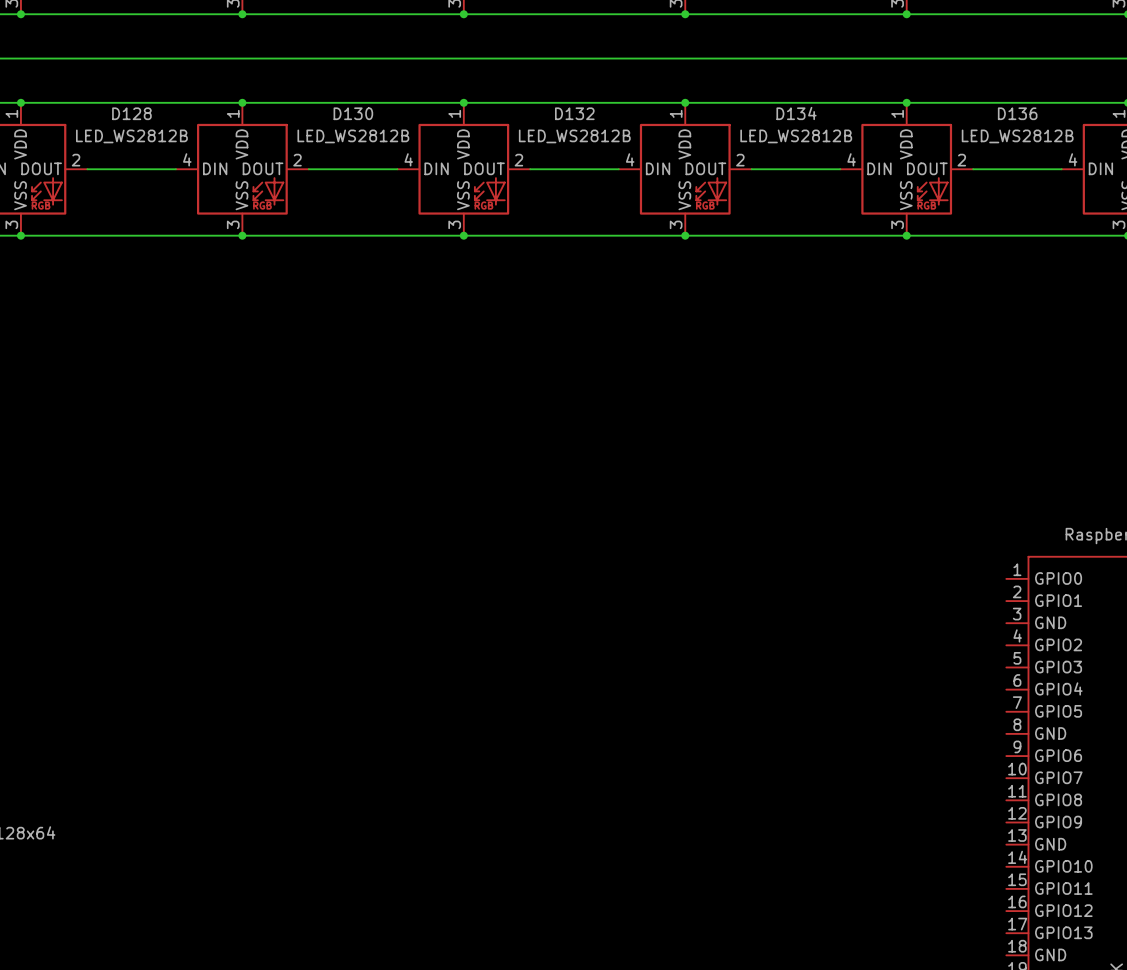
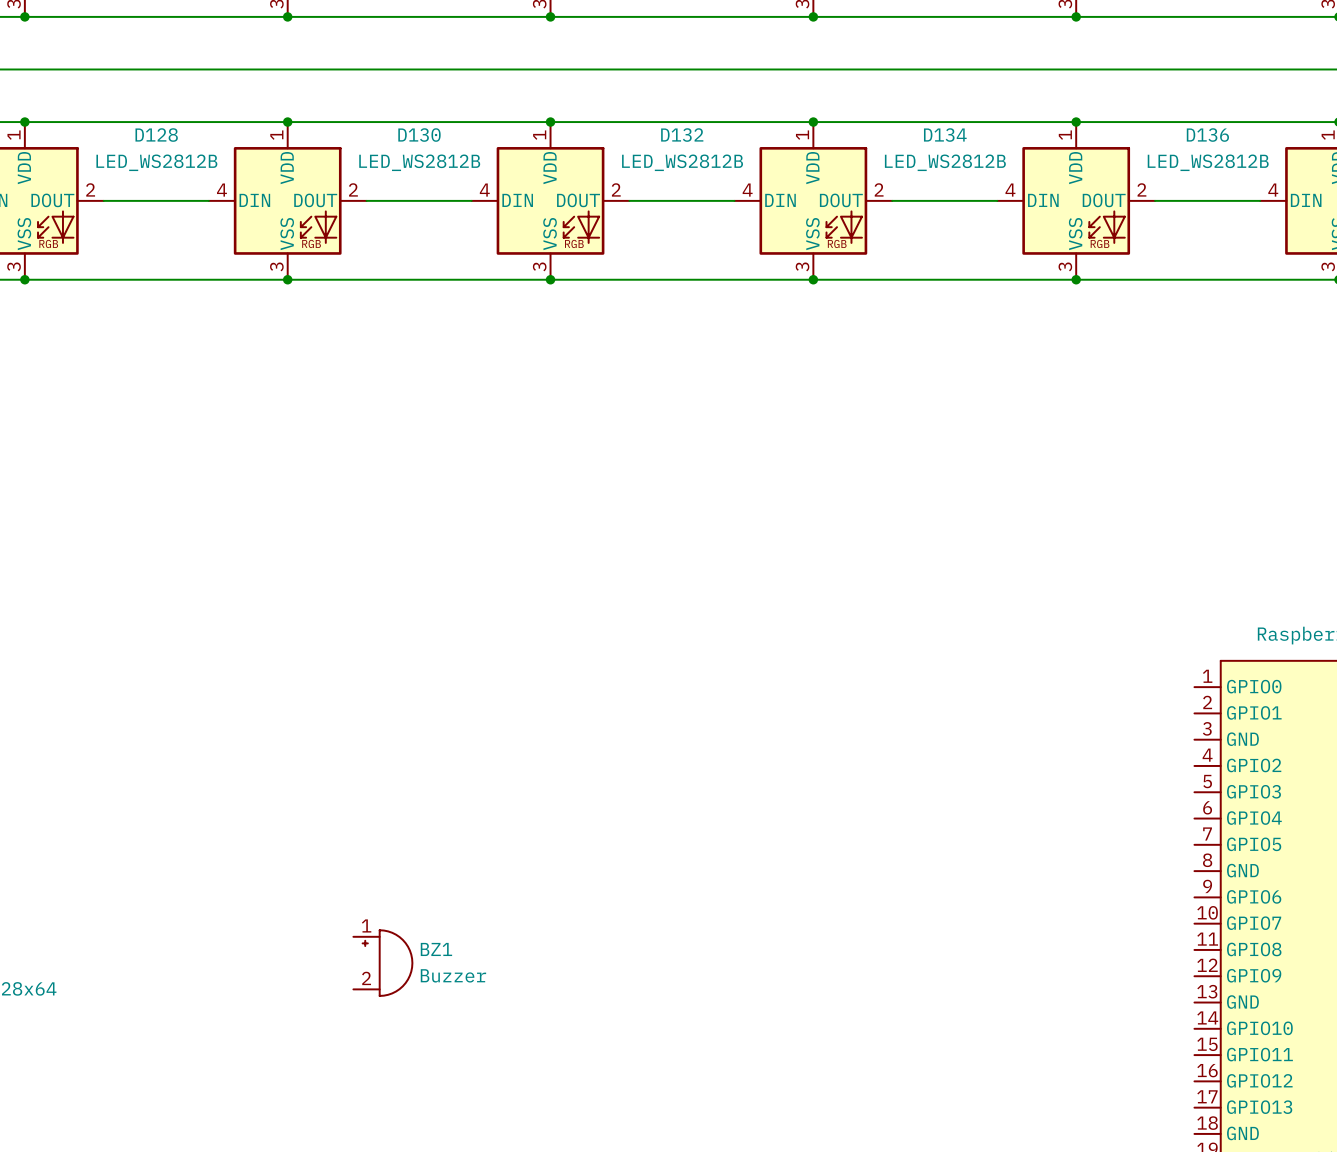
BZ1: none -> Buzzer (382, 963)

